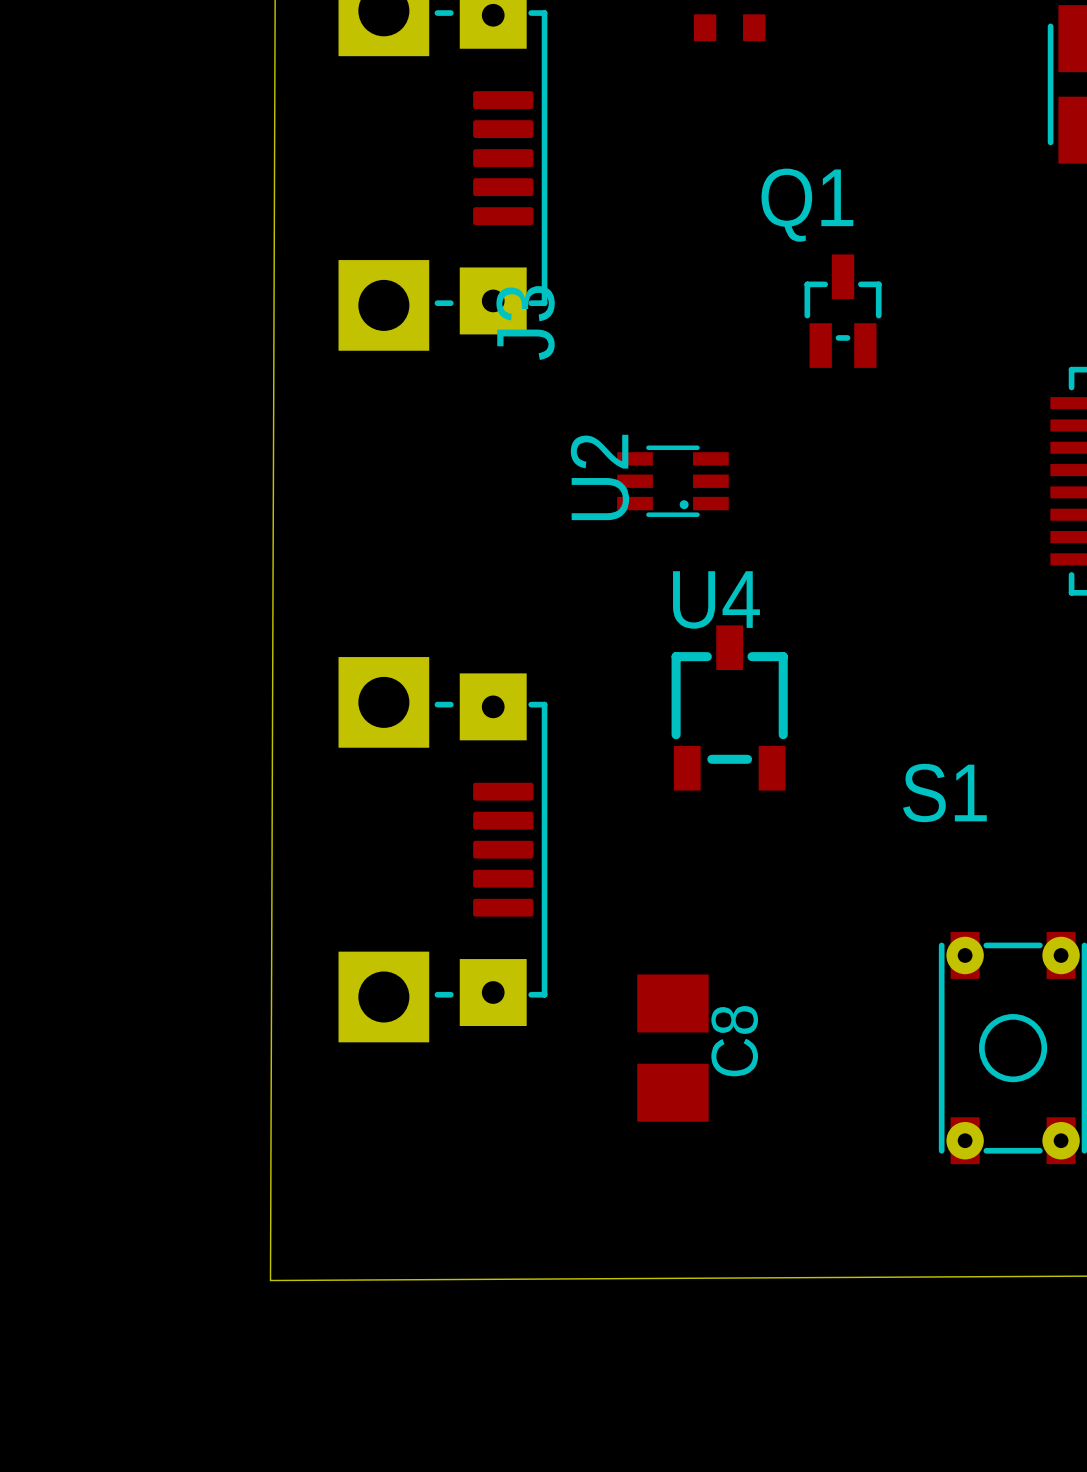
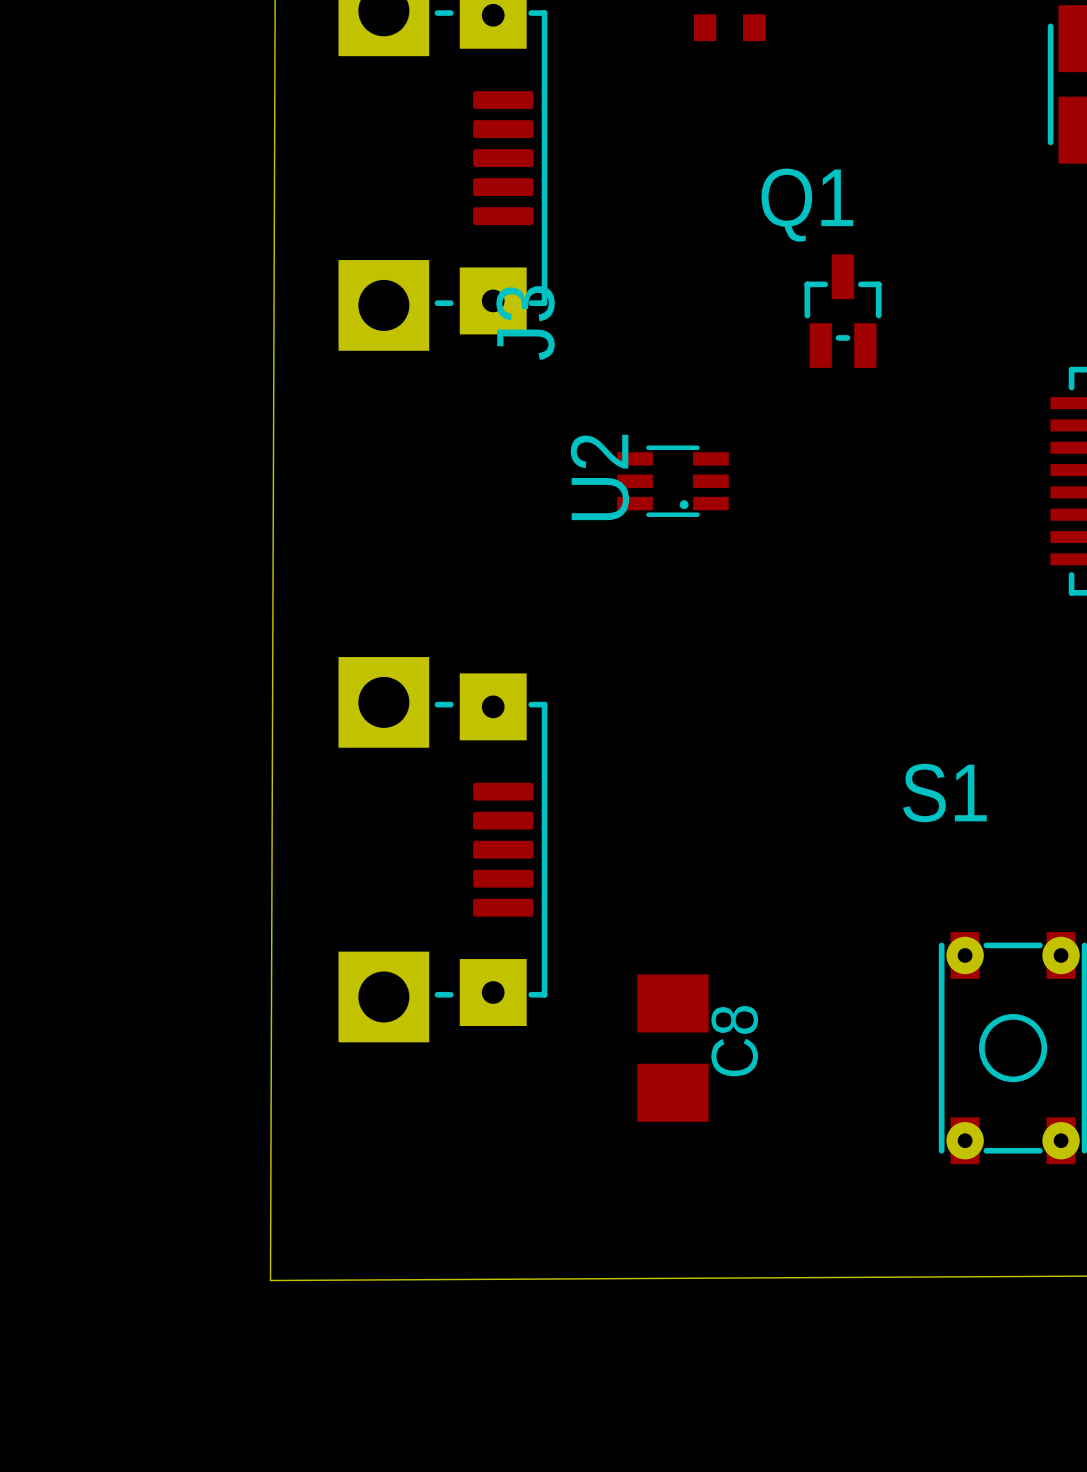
U4: (729, 707) -> none

